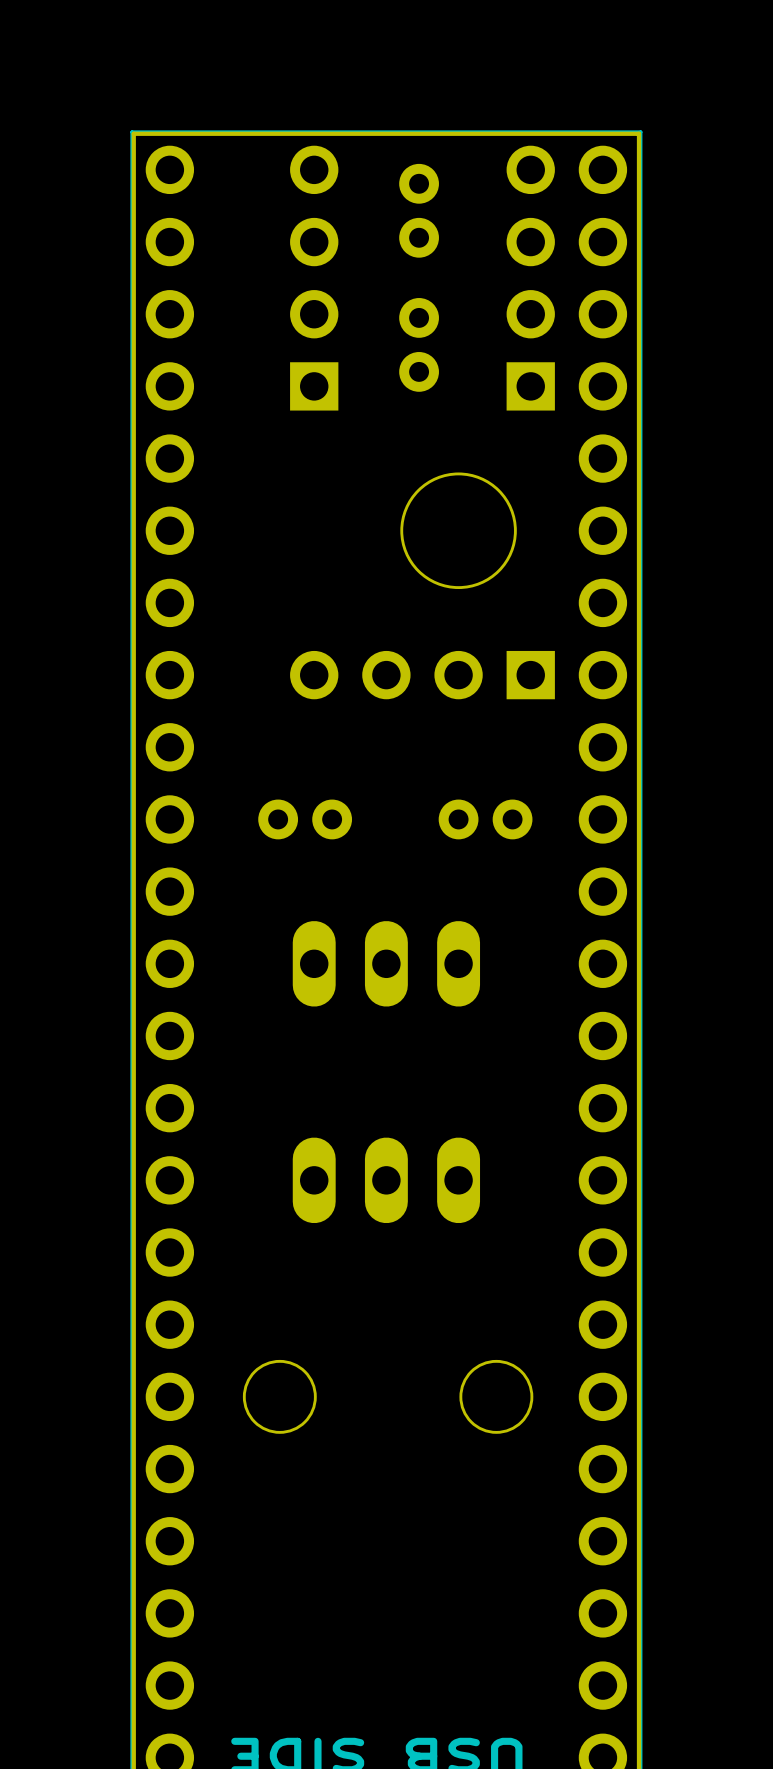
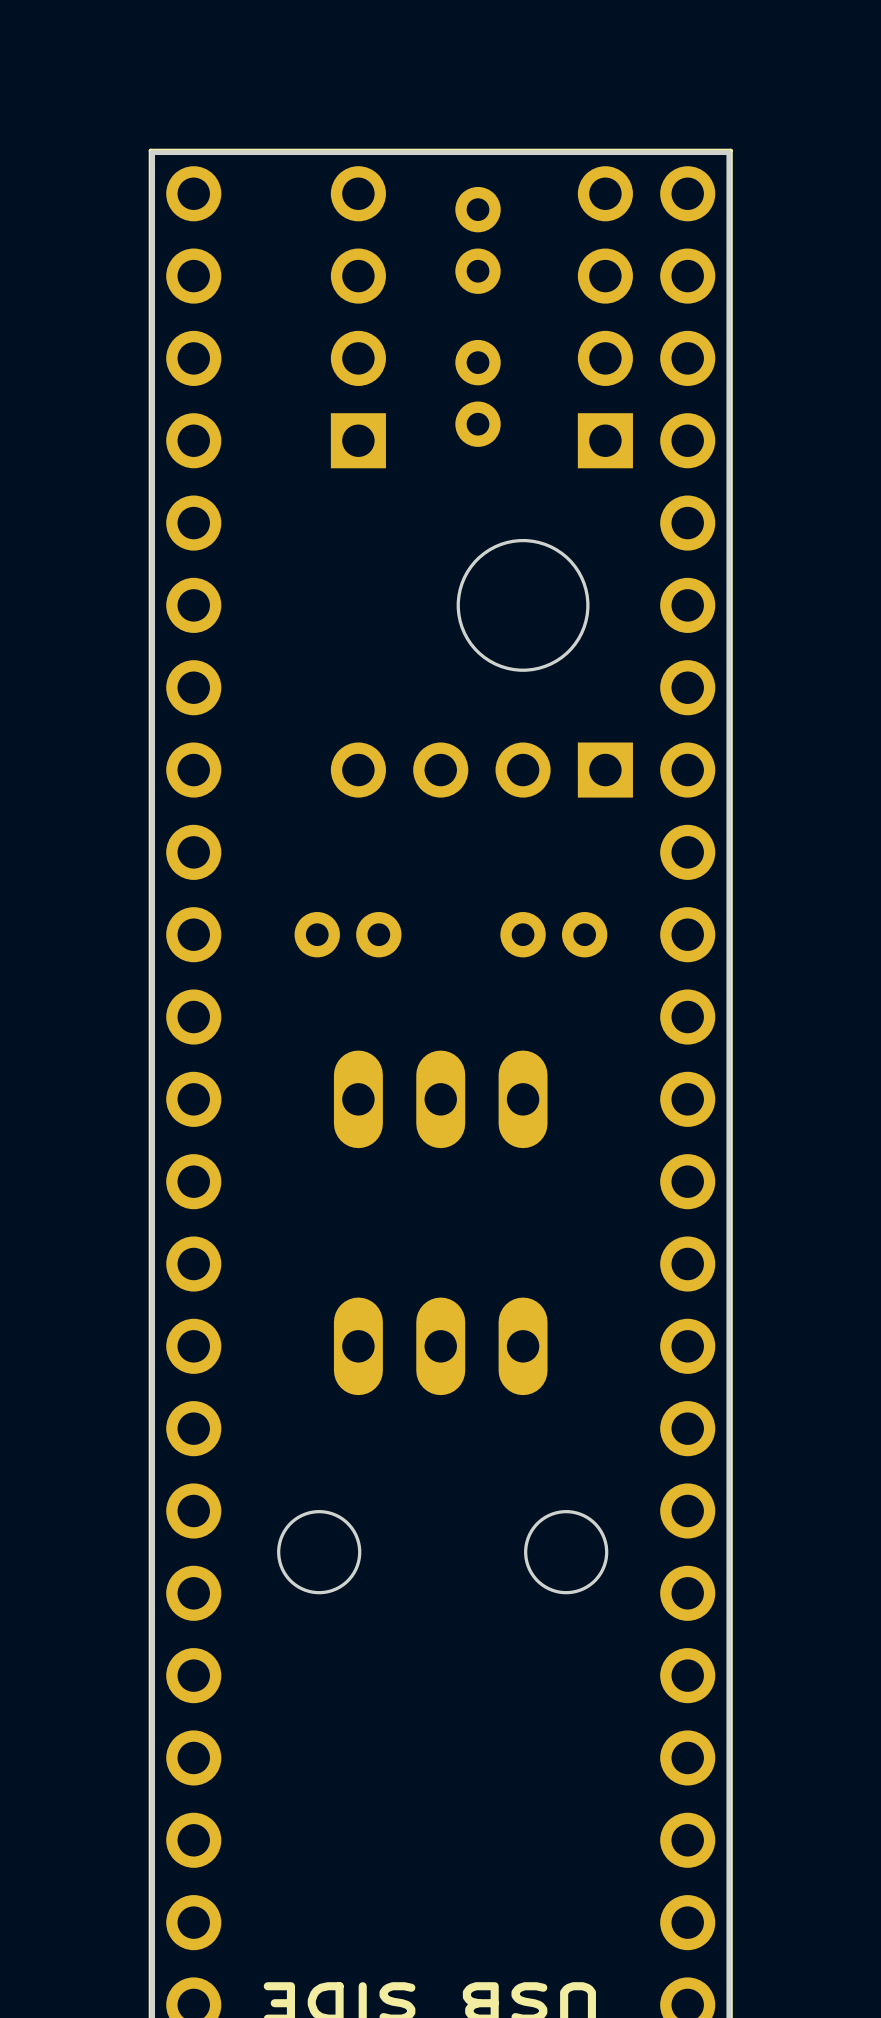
round board edge position: (279, 1396) -> (319, 1552)
round board edge position: (496, 1396) -> (566, 1552)

